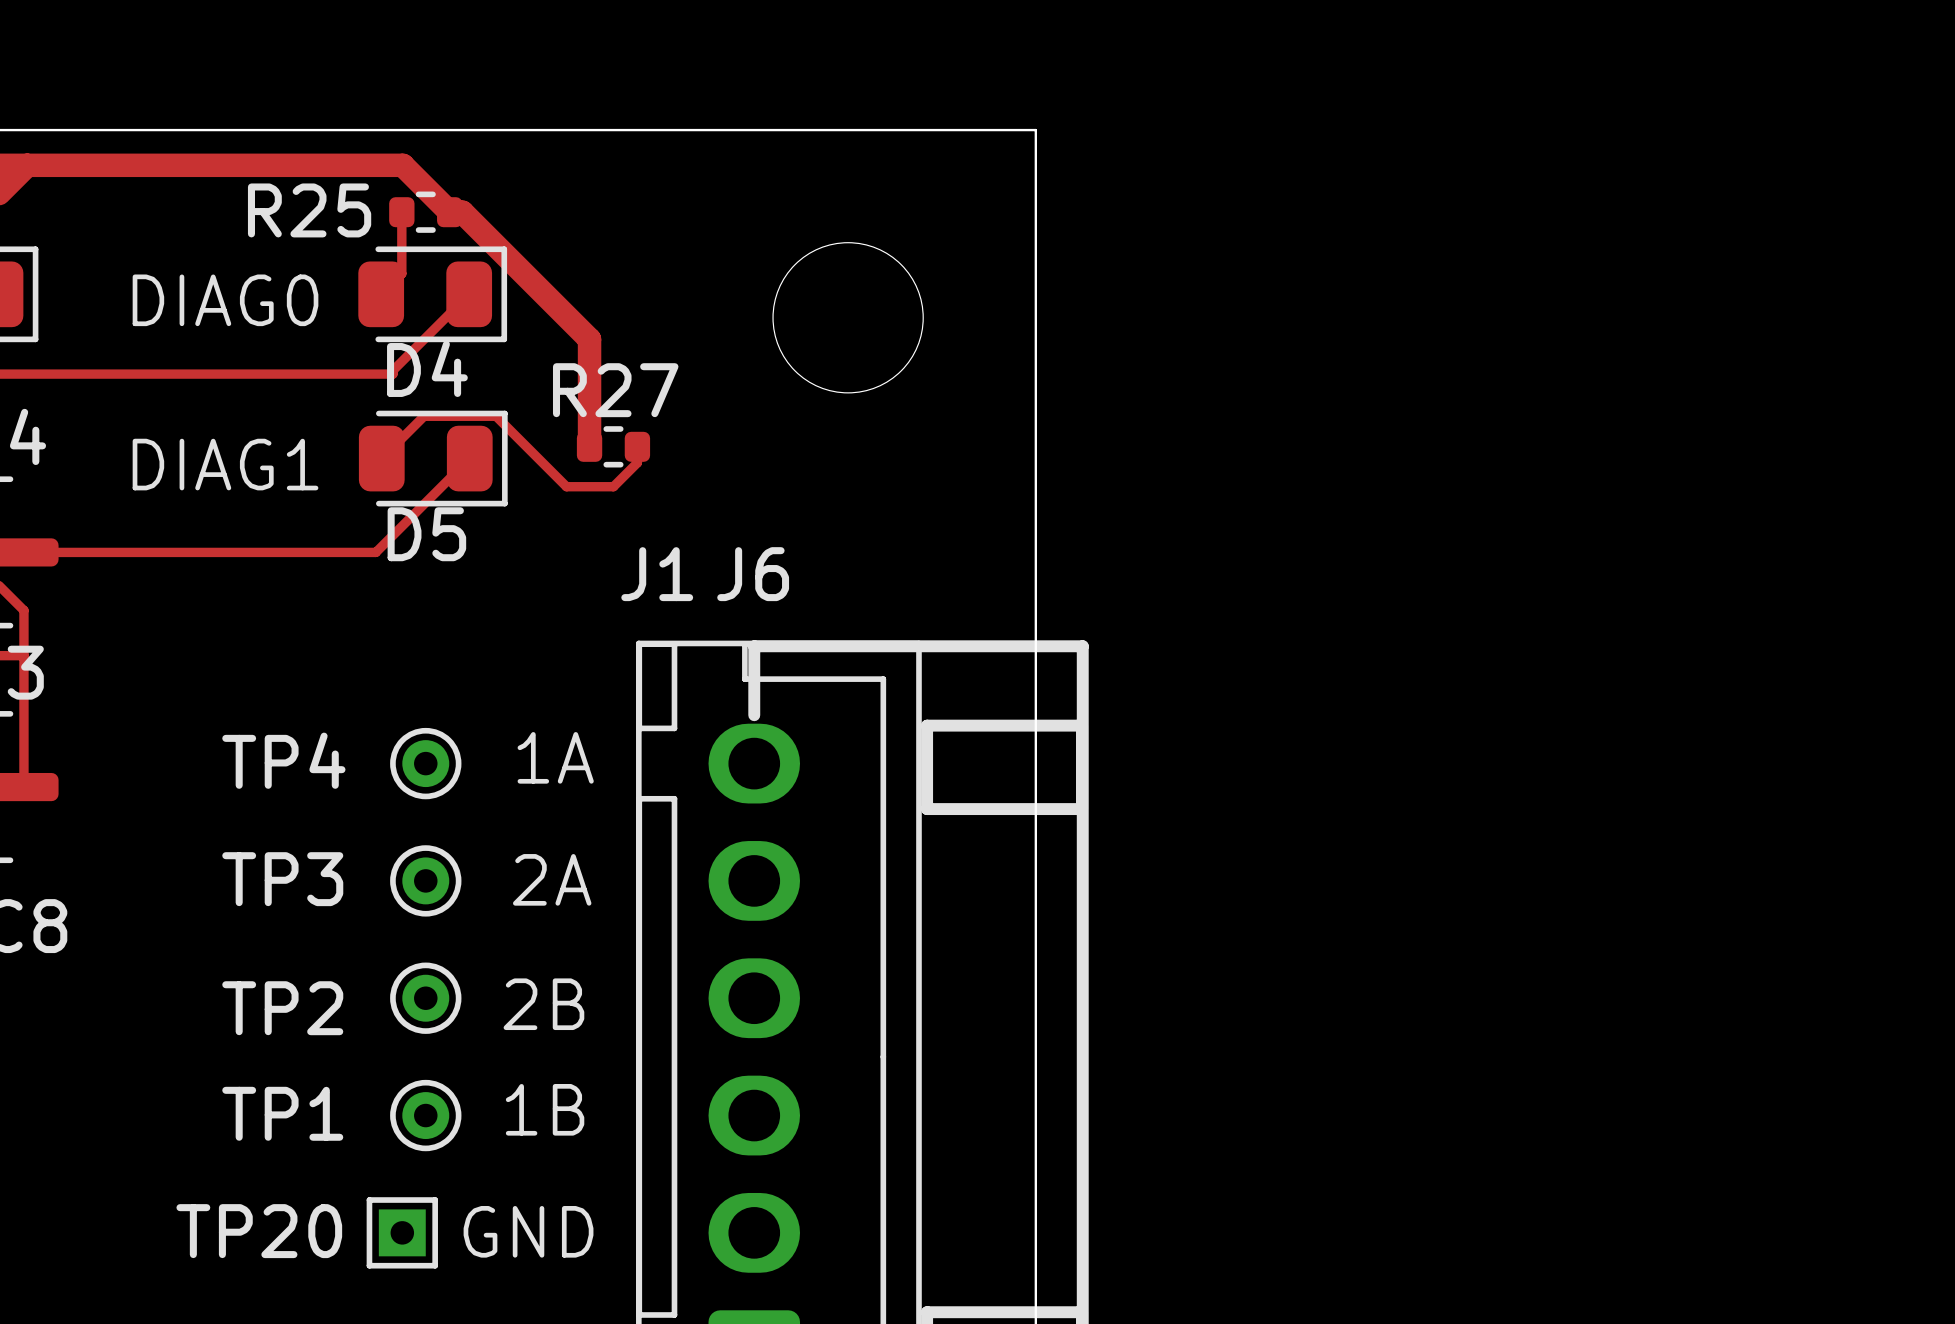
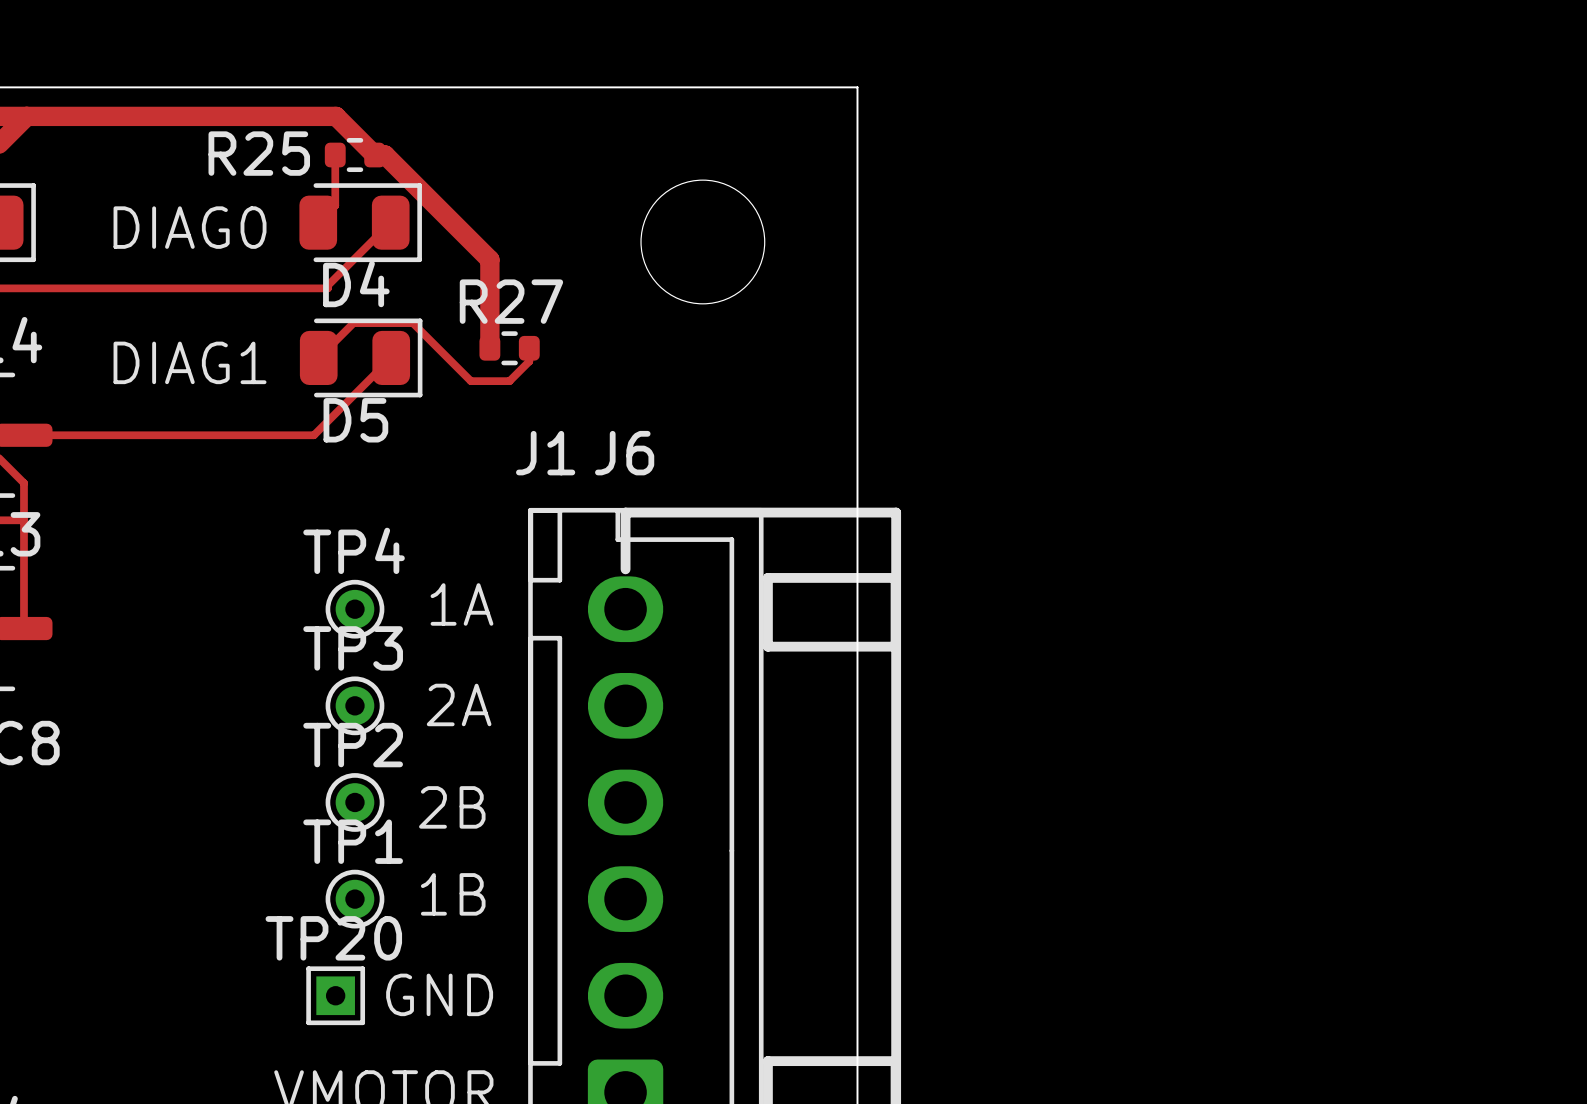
TP4 name position: TP4 (283, 760) -> TP4 (354, 550)
TP3 name position: TP3 (282, 879) -> TP3 (353, 648)
TP2 name position: TP2 (282, 1008) -> TP2 (353, 745)
TP1 name position: TP1 (282, 1113) -> TP1 (353, 841)
TP20 name position: TP20 (259, 1231) -> TP20 (333, 938)

